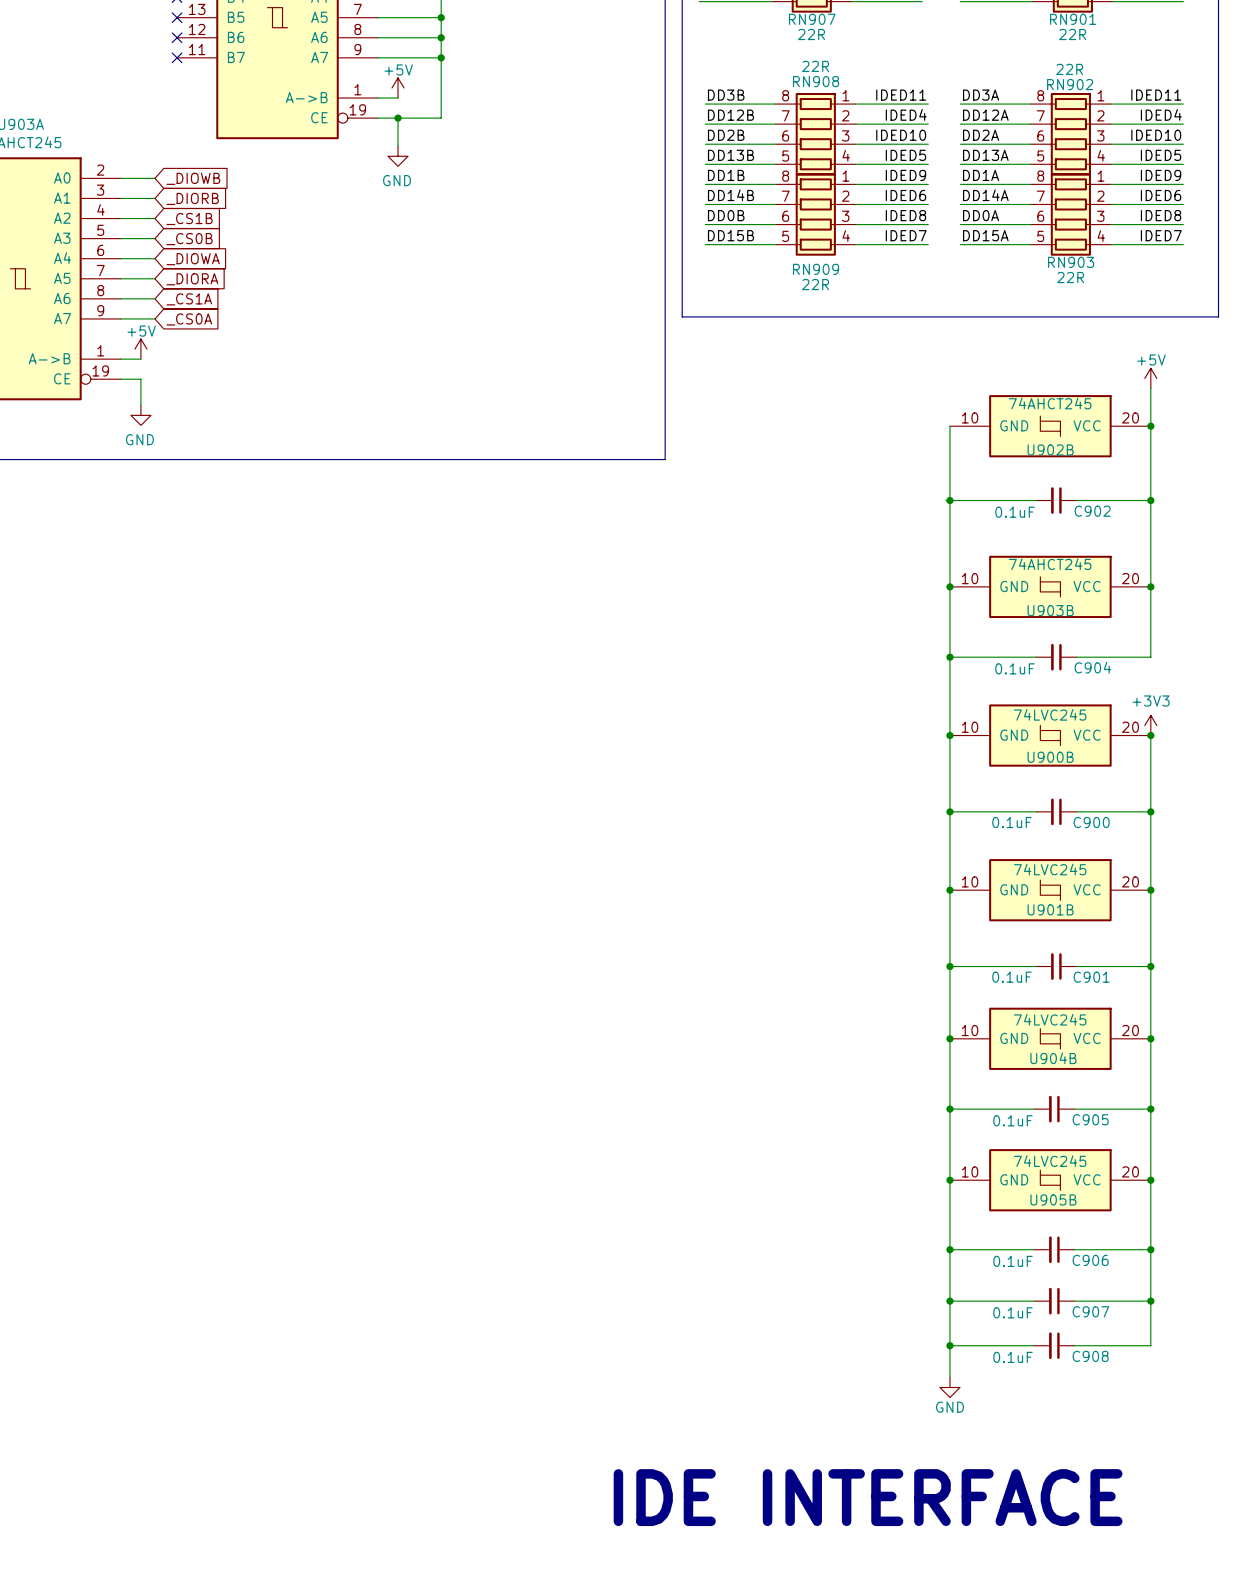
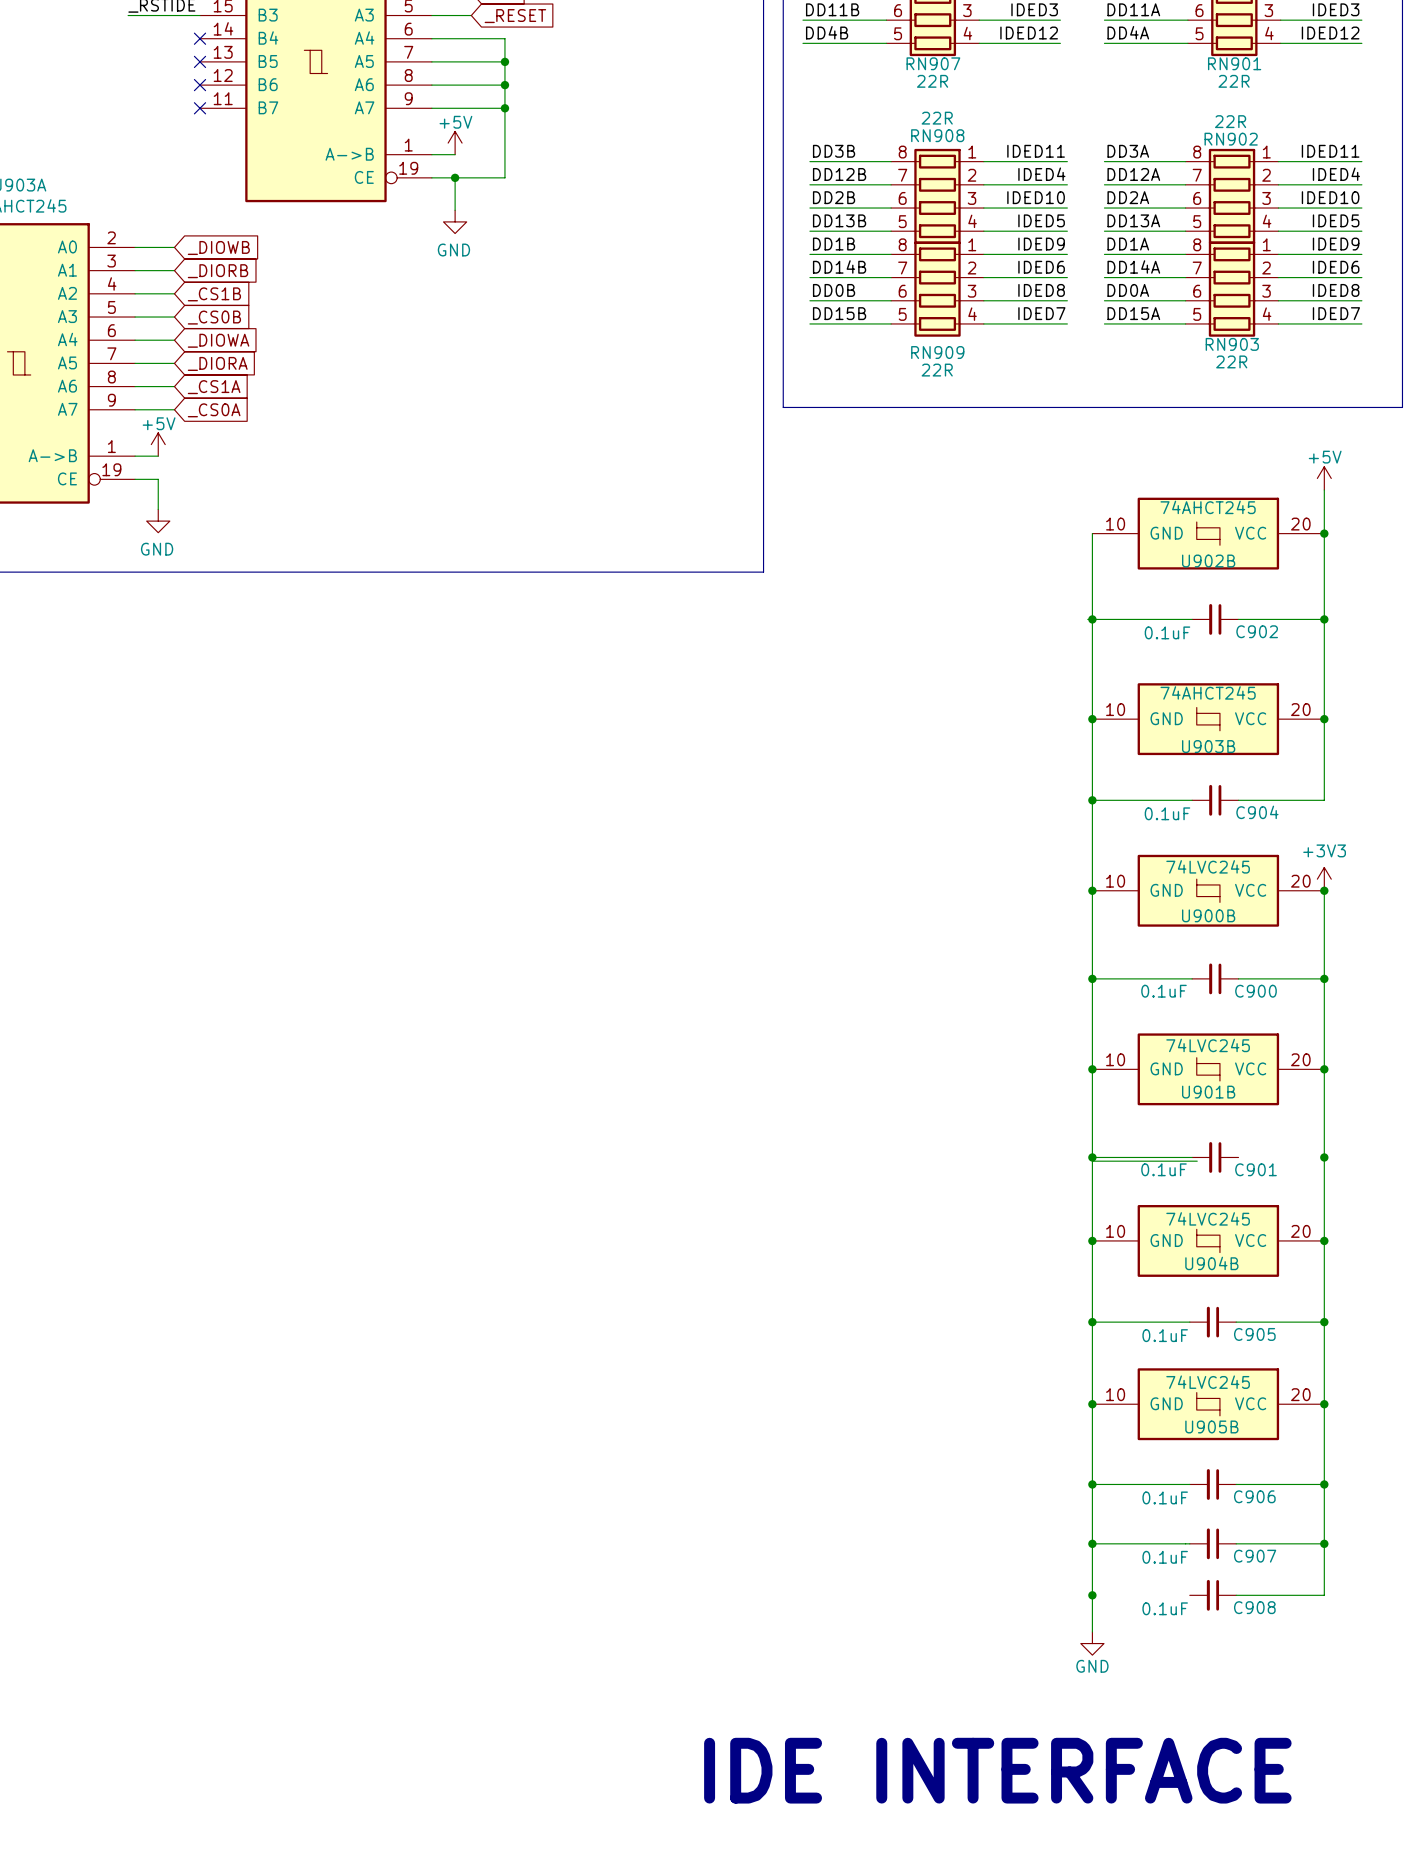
wire: (1076, 966) (1150, 966) -> none
wire: none -> (1092, 1161) (1197, 1161)
wire: (949, 1345) (1034, 1345) -> none

